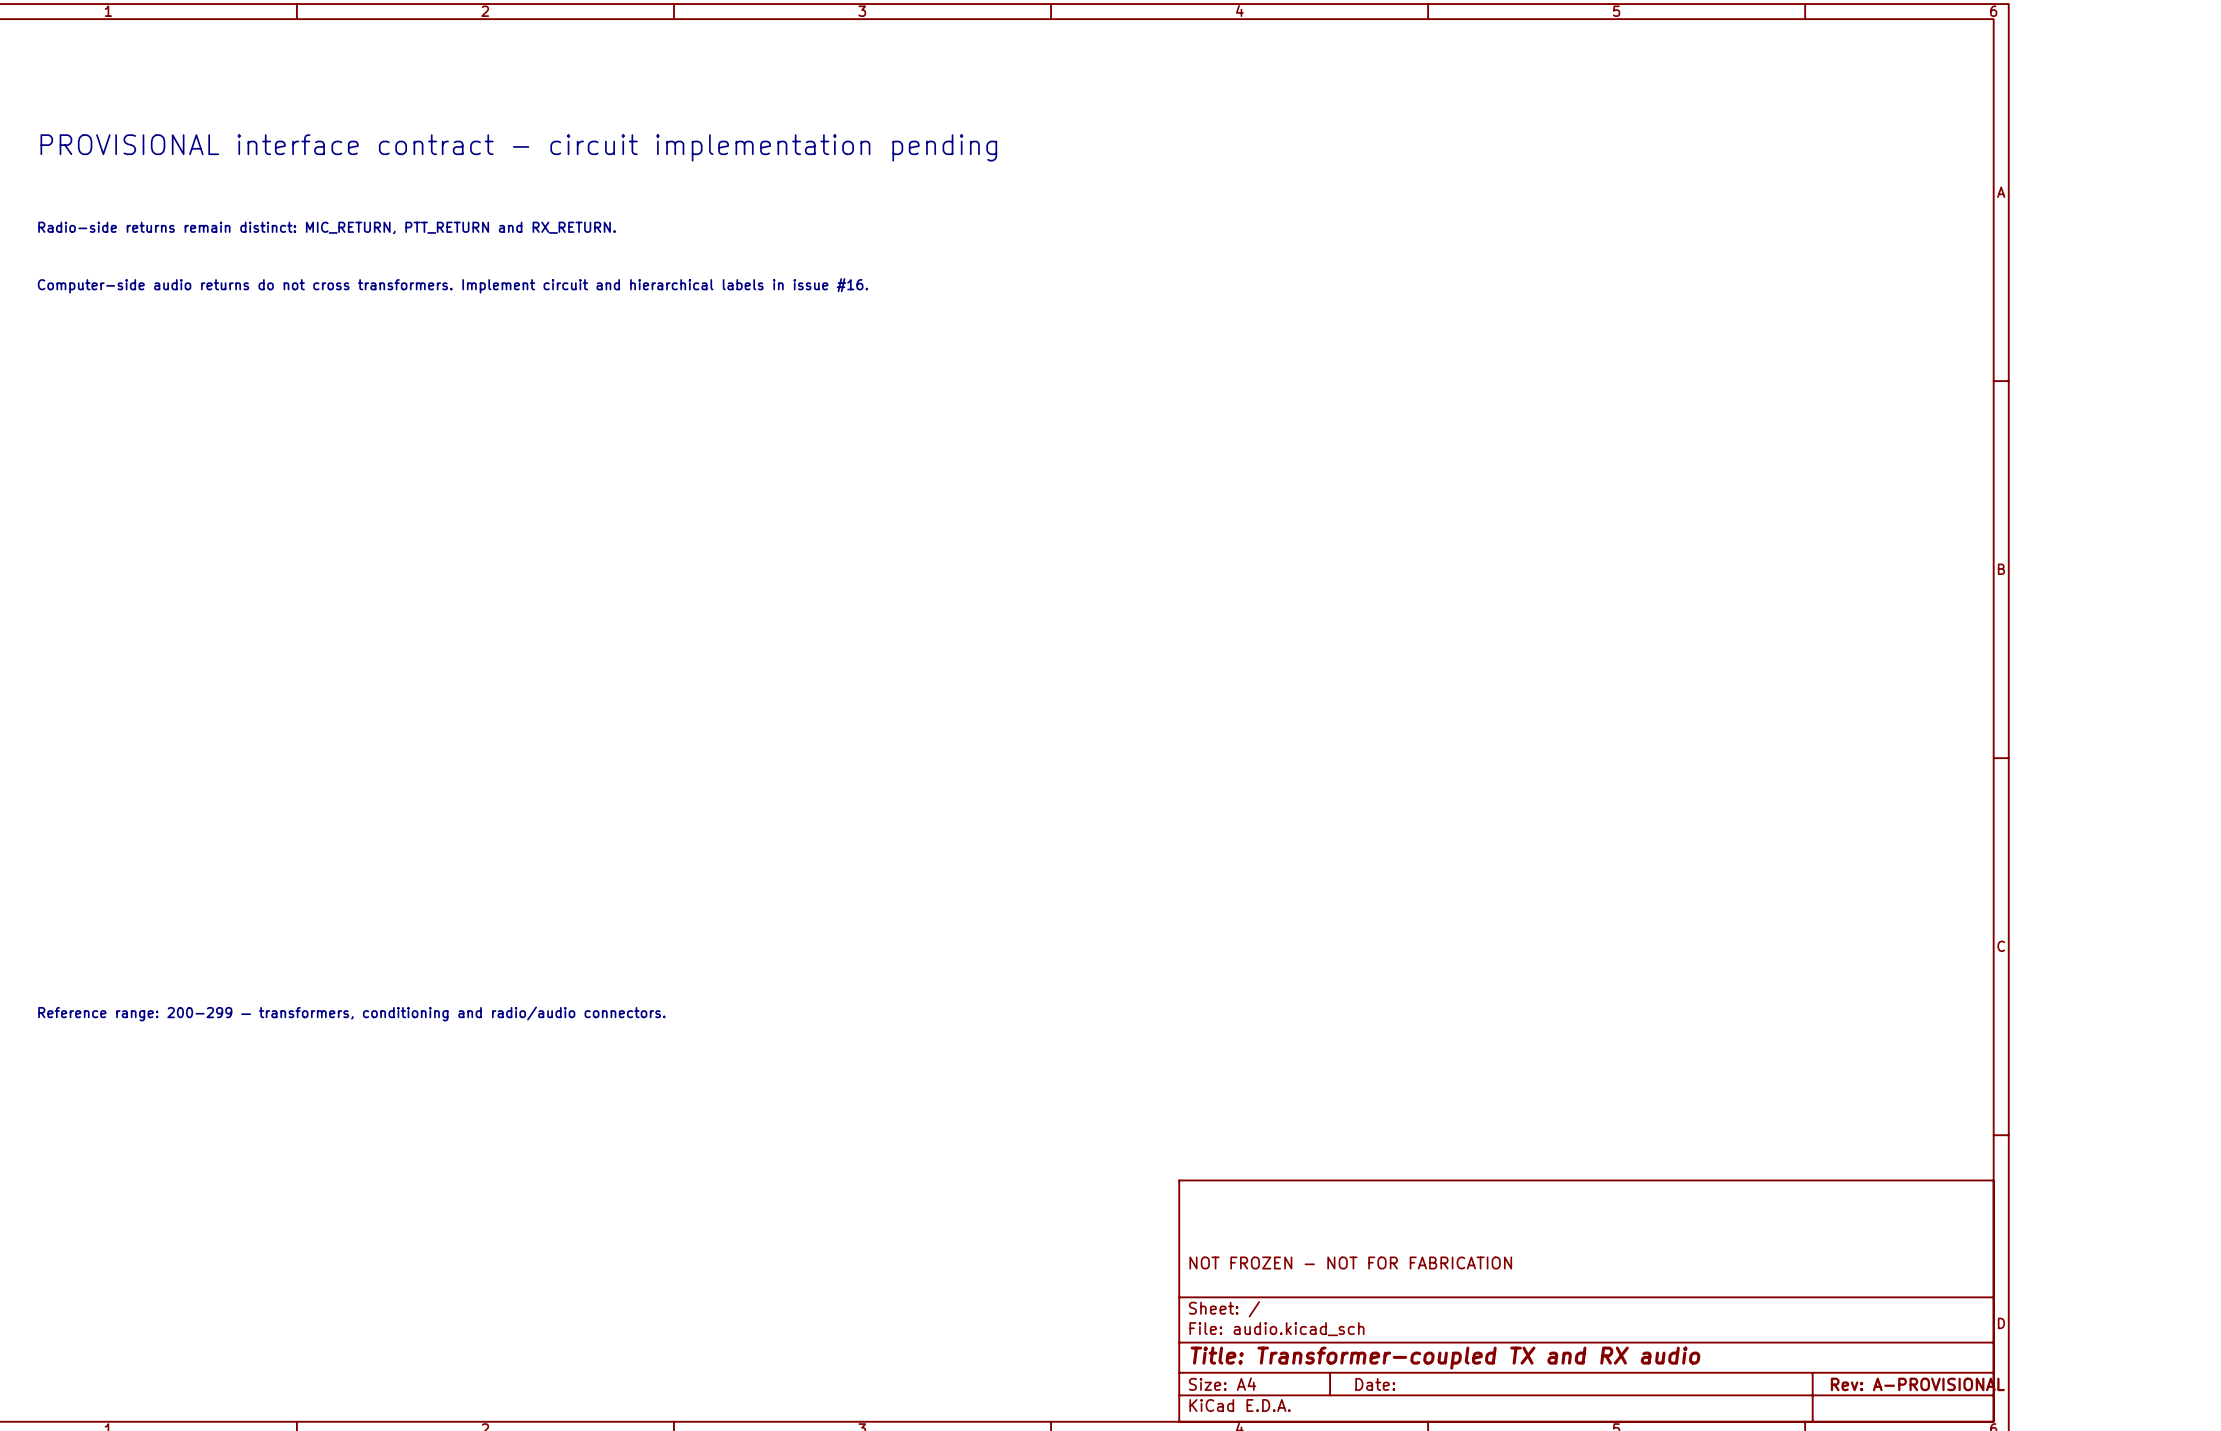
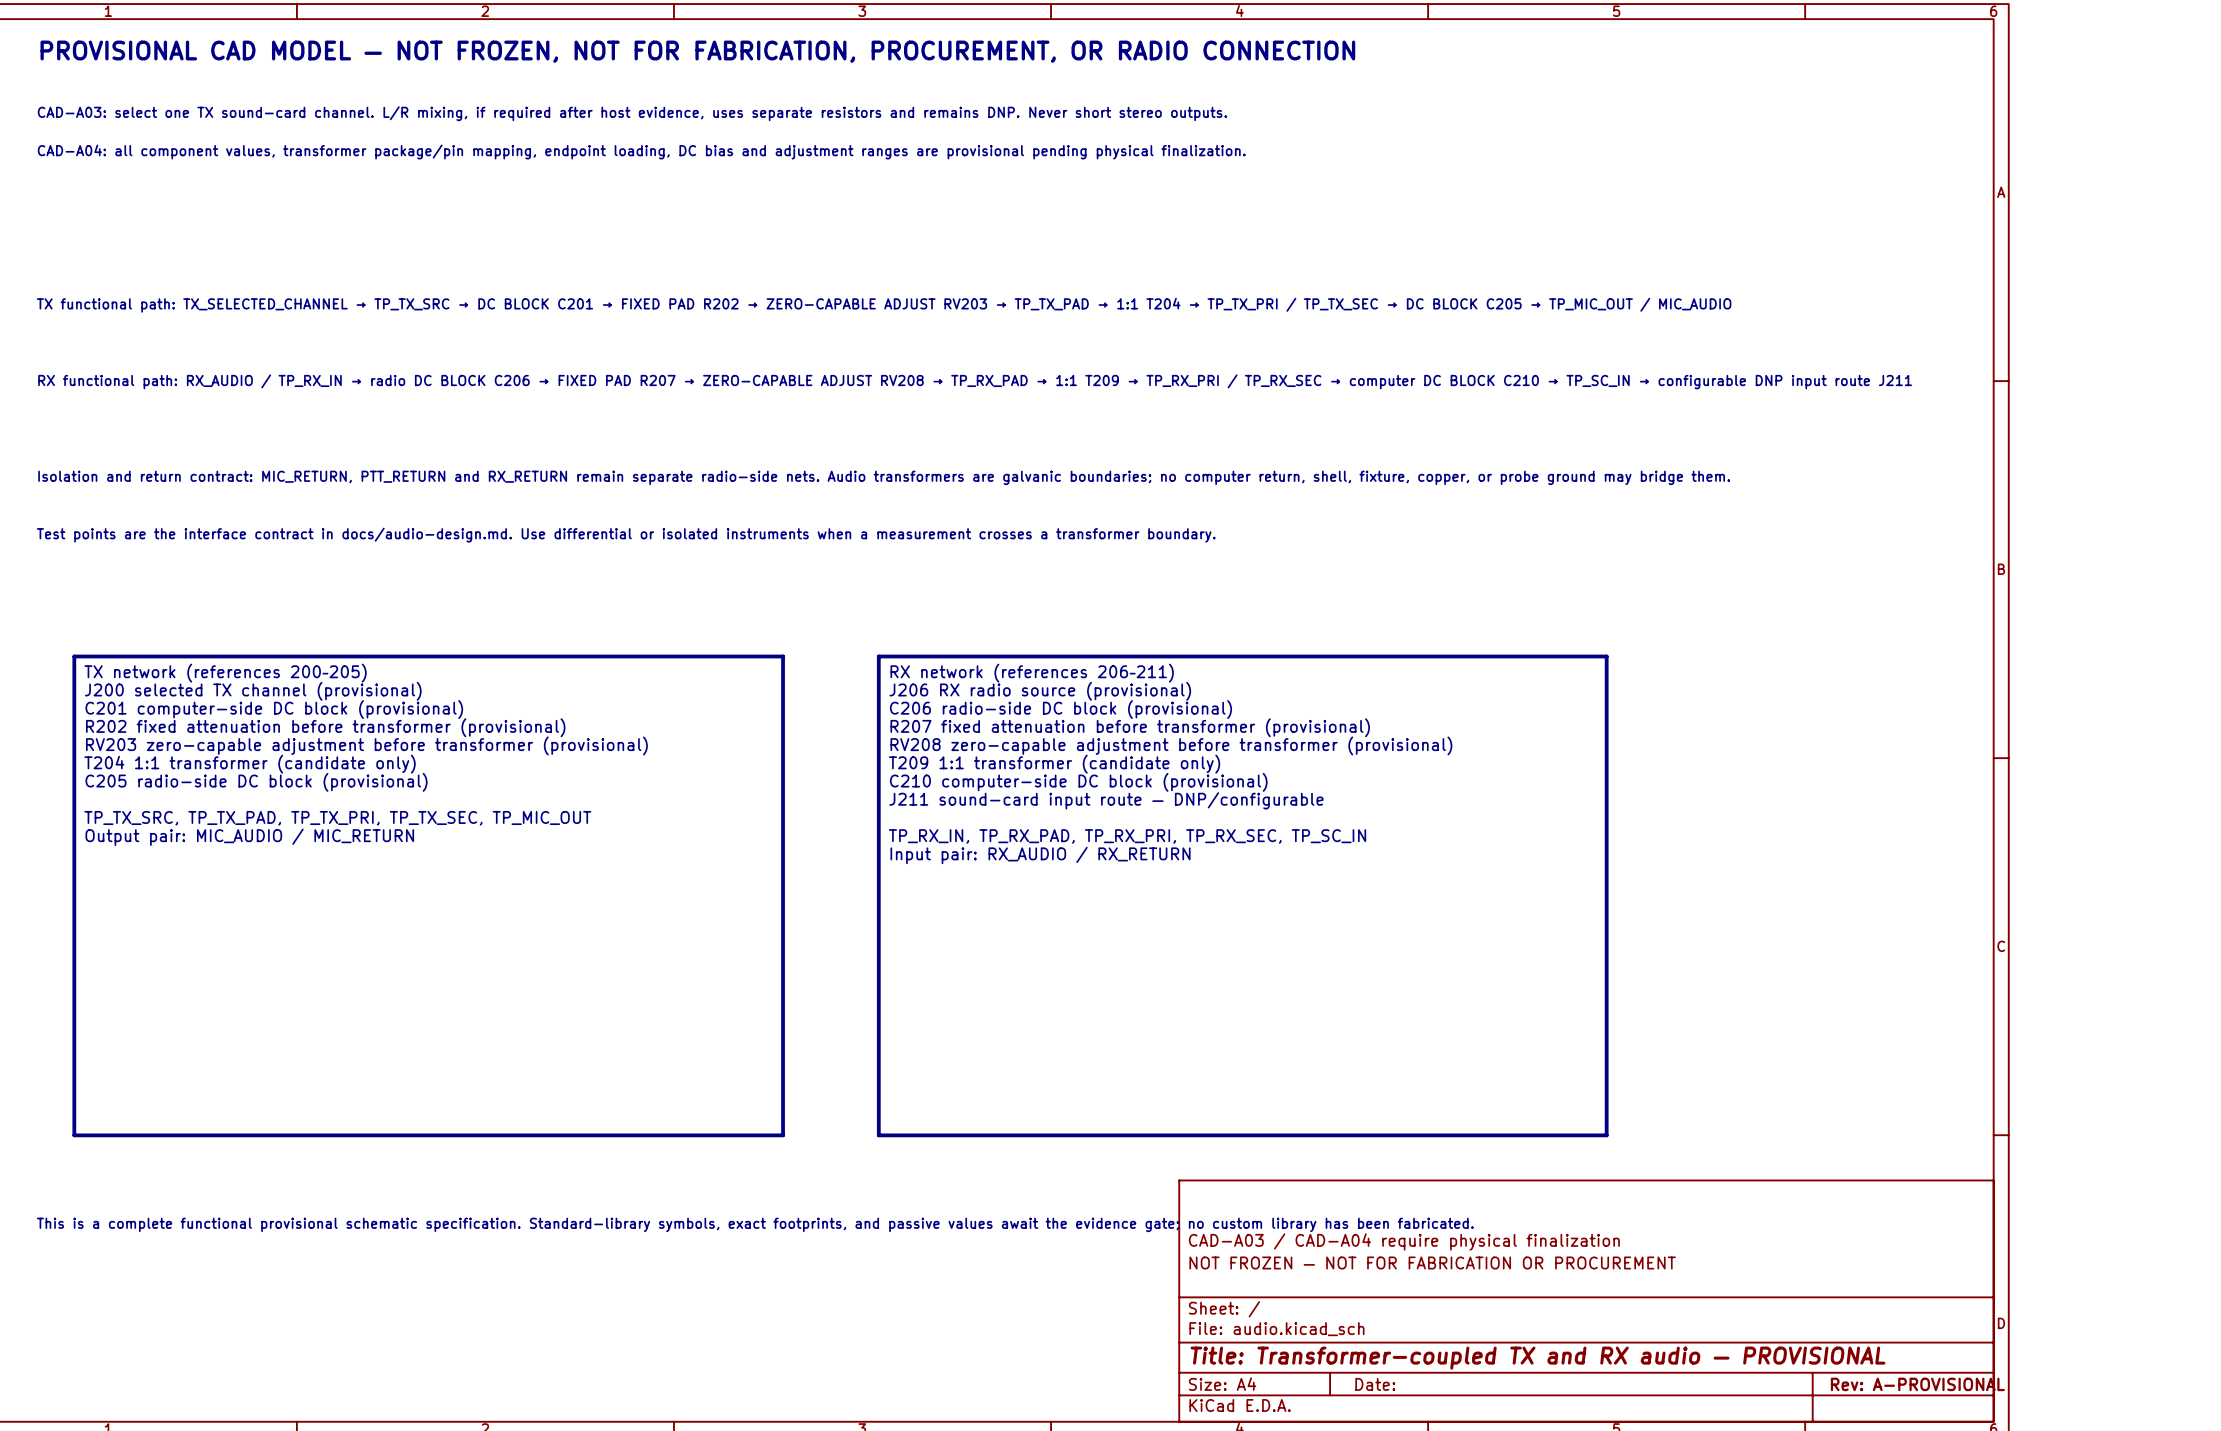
text: none -> PROVISIONAL CAD MODEL — NOT FROZEN, NOT FOR FABRICATION, PROCUREMENT, OR RADIO CONNECTION (697, 51)
text: none -> CAD-A03: select one TX sound-card channel. L/R mixing, if required after host evidence, uses separate resistors and remains DNP. Never short stereo outputs. (632, 113)
text: PROVISIONAL interface contract - circuit implementation pending (518, 147) -> CAD-A04: all component values, transformer package/pin mapping, endpoint loading, DC bias and adjustment ranges are provisional pending physical finalization. (641, 152)
text: Radio-side returns remain distinct: MIC_RETURN, PTT_RETURN and RX_RETURN. (327, 227) -> none
text: Computer-side audio returns do not cross transformers. Implement circuit and hierarchical labels in issue #16. (452, 285) -> none
text: none -> TX functional path: TX_SELECTED_CHANNEL → TP_TX_SRC → DC BLOCK C201 → FIXED PAD R202 → ZERO-CAPABLE ADJUST RV203 → TP_TX_PAD → 1:1 T204 → TP_TX_PRI / TP_TX_SEC → DC BLOCK C205 → TP_MIC_OUT / MIC_AUDIO (884, 305)
text: none -> RX functional path: RX_AUDIO / TP_RX_IN → radio DC BLOCK C206 → FIXED PAD R207 → ZERO-CAPABLE ADJUST RV208 → TP_RX_PAD → 1:1 T209 → TP_RX_PRI / TP_RX_SEC → computer DC BLOCK C210 → TP_SC_IN → configurable DNP input route J211 (975, 381)
text: none -> Isolation and return contract: MIC_RETURN, PTT_RETURN and RX_RETURN remain separate radio-side nets. Audio transformers are galvanic boundaries; no computer return, shell, fixture, copper, or probe ground may bridge them. (884, 477)
text: none -> Test points are the interface contract in docs/audio-design.md. Use differential or isolated instruments when a measurement crosses a transformer boundary. (626, 535)
line: none -> (74, 656) (783, 656) (783, 1135) (74, 1135) (74, 656)
line: none -> (878, 656) (1606, 656) (1606, 1135) (878, 1135) (878, 656)
text: none -> TX network (references 200–205) (225, 673)
text: none -> RX network (references 206–211) (1032, 673)
text: none -> J200 selected TX channel (provisional) (253, 691)
text: none -> J206 RX radio source (provisional) (1040, 691)
text: none -> C201 computer-side DC block (provisional) (274, 709)
text: none -> C206 radio-side DC block (provisional) (1060, 709)
text: none -> R202 fixed attenuation before transformer (provisional) (325, 727)
text: none -> R207 fixed attenuation before transformer (provisional) (1130, 727)
text: none -> RV203 zero-capable adjustment before transformer (provisional) (366, 745)
text: none -> RV208 zero-capable adjustment before transformer (provisional) (1171, 745)
text: none -> T204 1:1 transformer (candidate only) (250, 764)
text: none -> T209 1:1 transformer (candidate only) (1054, 764)
text: none -> C205 radio-side DC block (provisional) (256, 782)
text: none -> C210 computer-side DC block (provisional) (1078, 782)
text: none -> J211 sound-card input route — DNP/configurable (1106, 800)
text: none -> TP_TX_SRC, TP_TX_PAD, TP_TX_PRI, TP_TX_SEC, TP_MIC_OUT (337, 818)
text: none -> TP_RX_IN, TP_RX_PAD, TP_RX_PRI, TP_RX_SEC, TP_SC_IN (1127, 836)
text: none -> Output pair: MIC_AUDIO / MIC_RETURN (249, 837)
text: none -> Input pair: RX_AUDIO / RX_RETURN (1040, 855)
text: Reference range: 200-299 — transformers, conditioning and radio/audio connectors. (351, 1013) -> none
text: none -> This is a complete functional provisional schematic specification. Standard-library symbols, exact footprints, and passive values await the evidence gate; no custom library has been fabricated. (755, 1224)
title block: none -> CAD-A03 / CAD-A04 require physical finalization (1404, 1241)
title block: NOT FROZEN - NOT FOR FABRICATION (1350, 1262) -> NOT FROZEN — NOT FOR FABRICATION OR PROCUREMENT (1432, 1262)
title block: Title: Transformer-coupled TX and RX audio (1445, 1358) -> Title: Transformer-coupled TX and RX audio — PROVISIONAL (1538, 1358)

